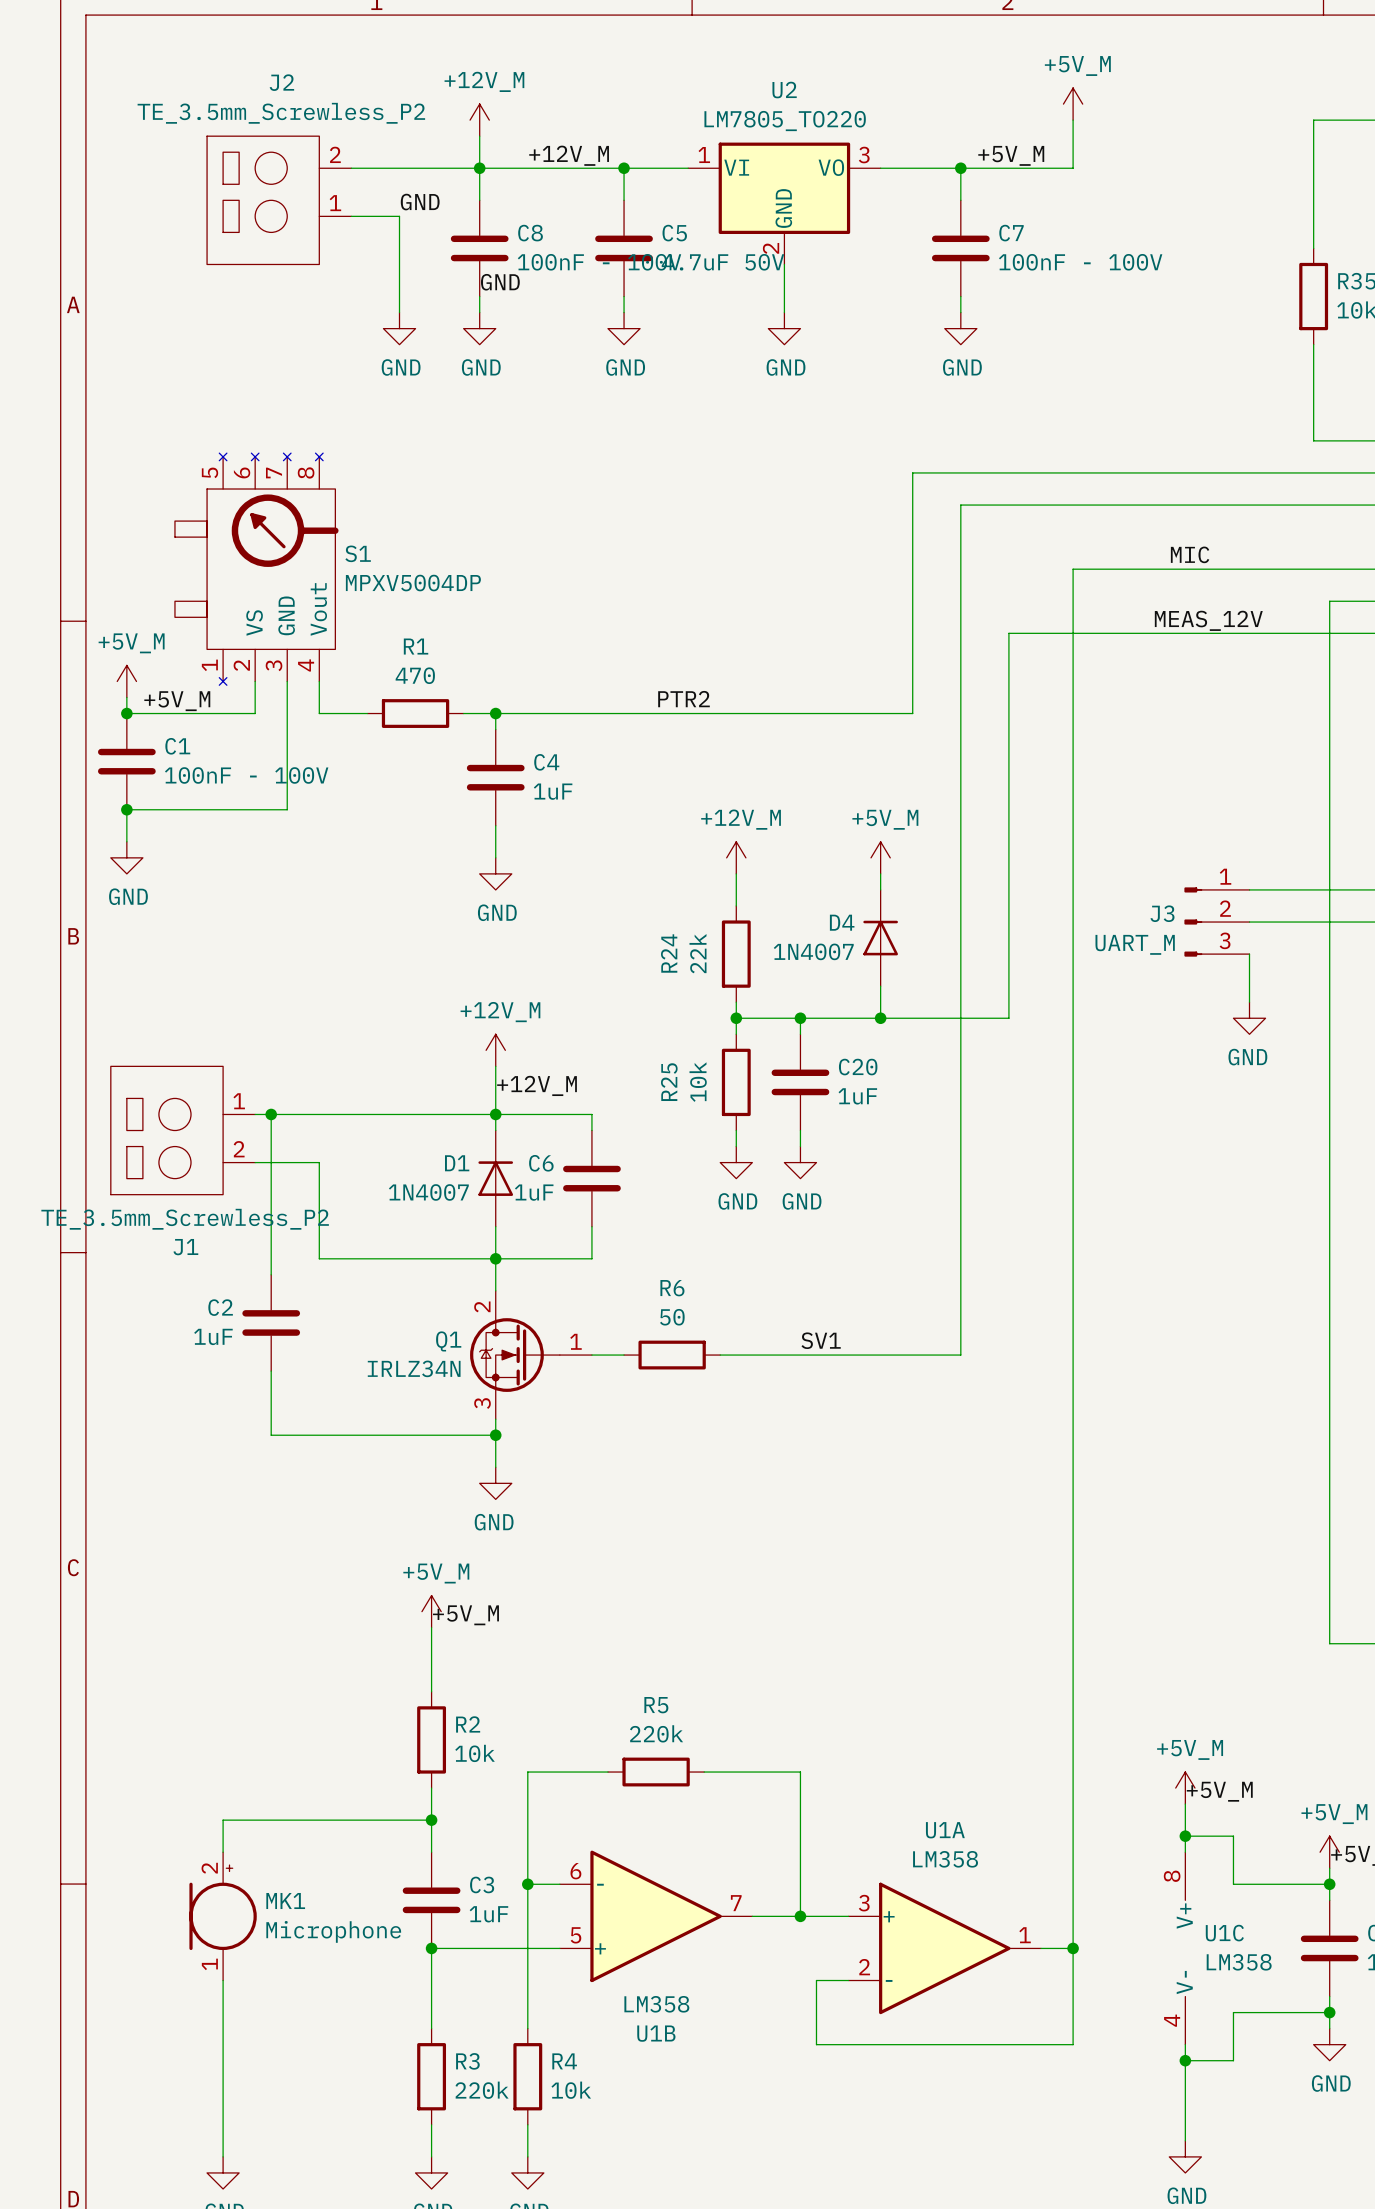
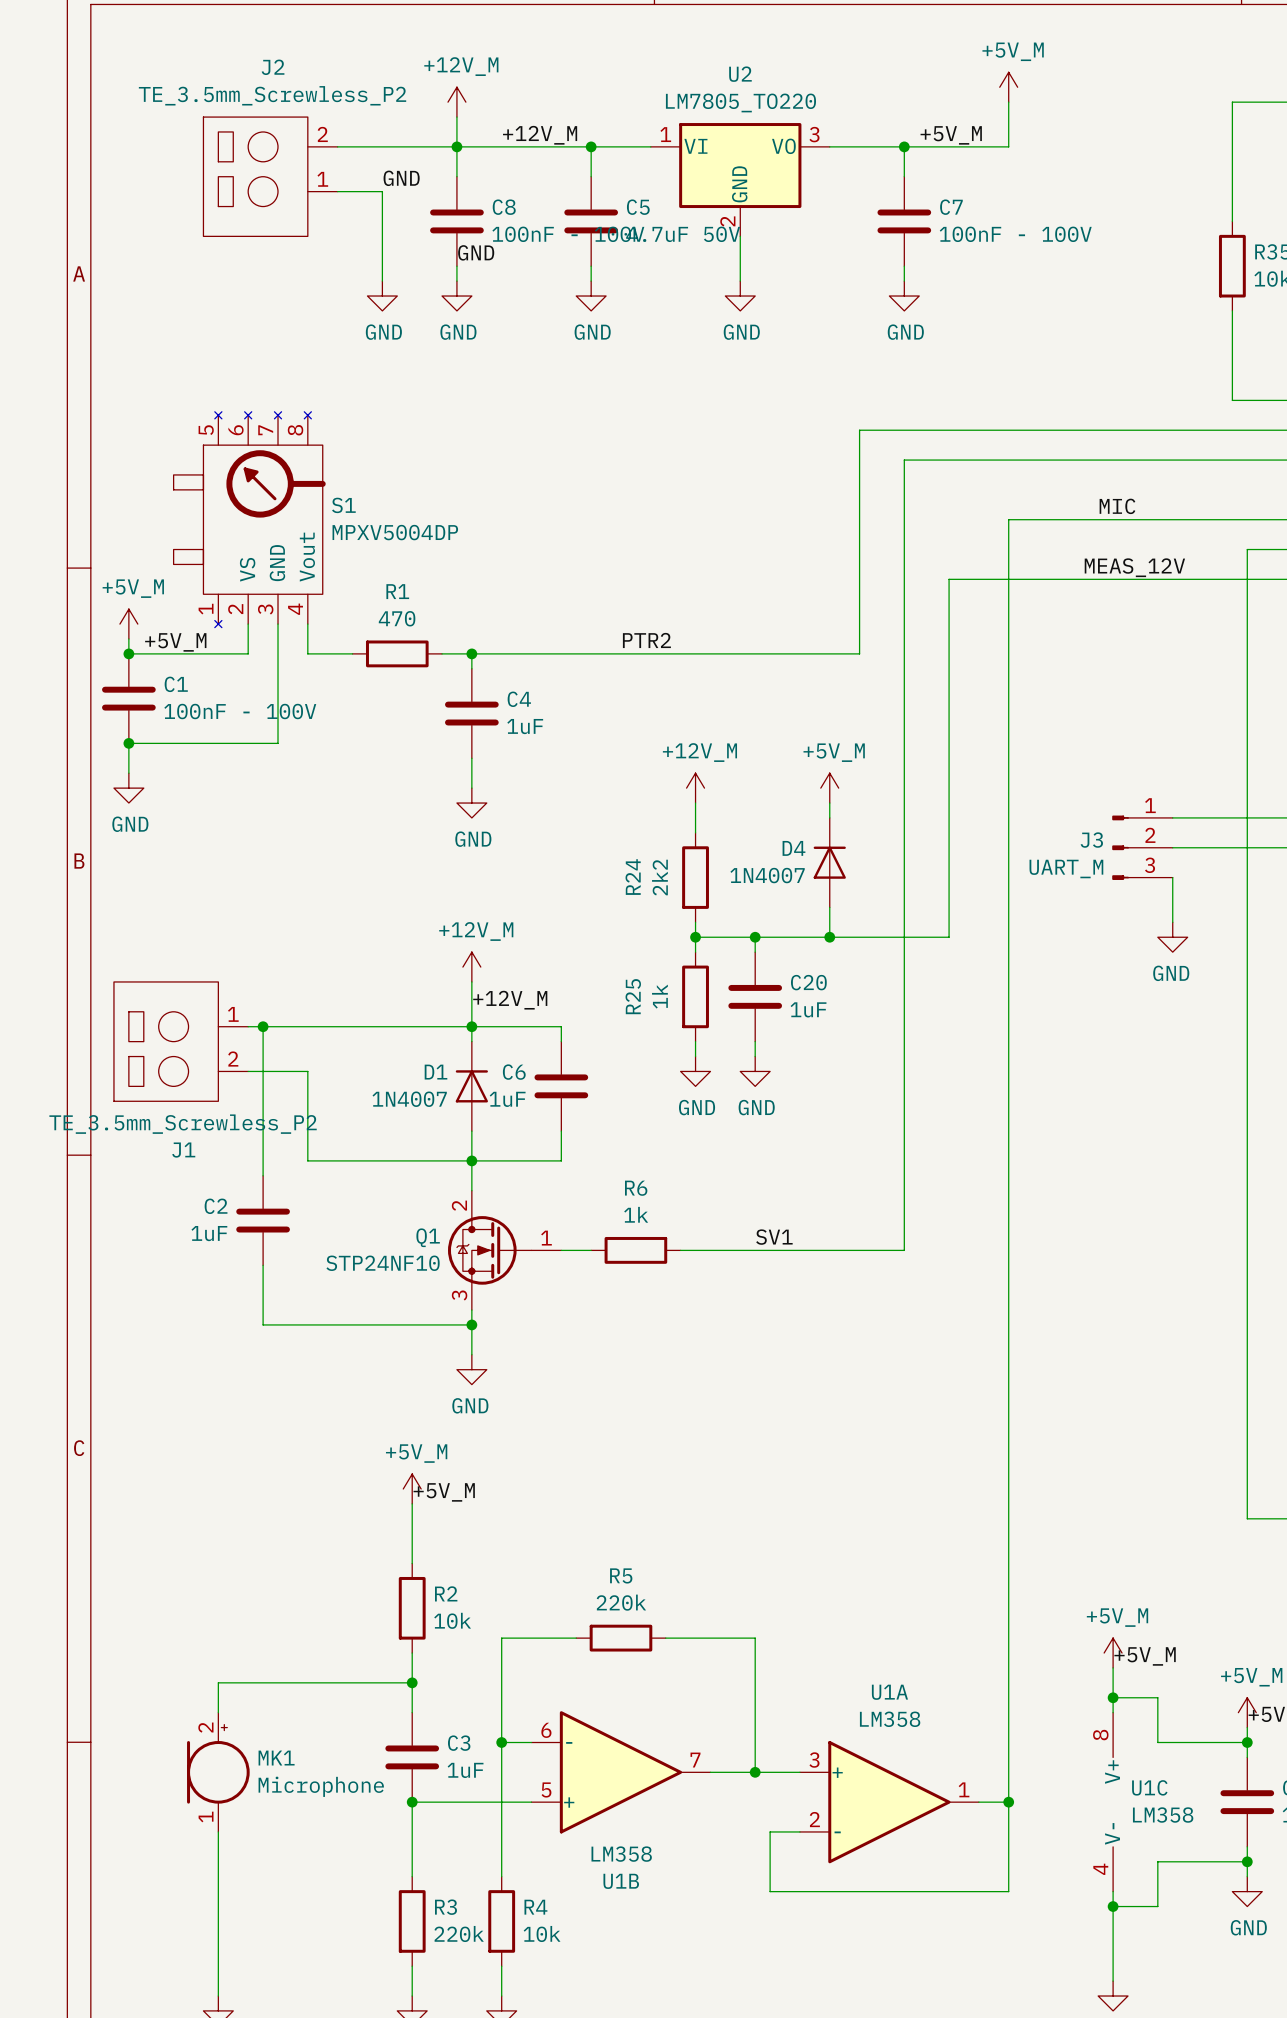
R24 value: 22k (698, 953) -> 2k2 (659, 877)
R25 value: 10k (698, 1082) -> 1k (659, 996)
R6 value: 50 (672, 1317) -> 1k (636, 1214)
Q1 value: IRLZ34N (414, 1368) -> STP24NF10 (383, 1263)

